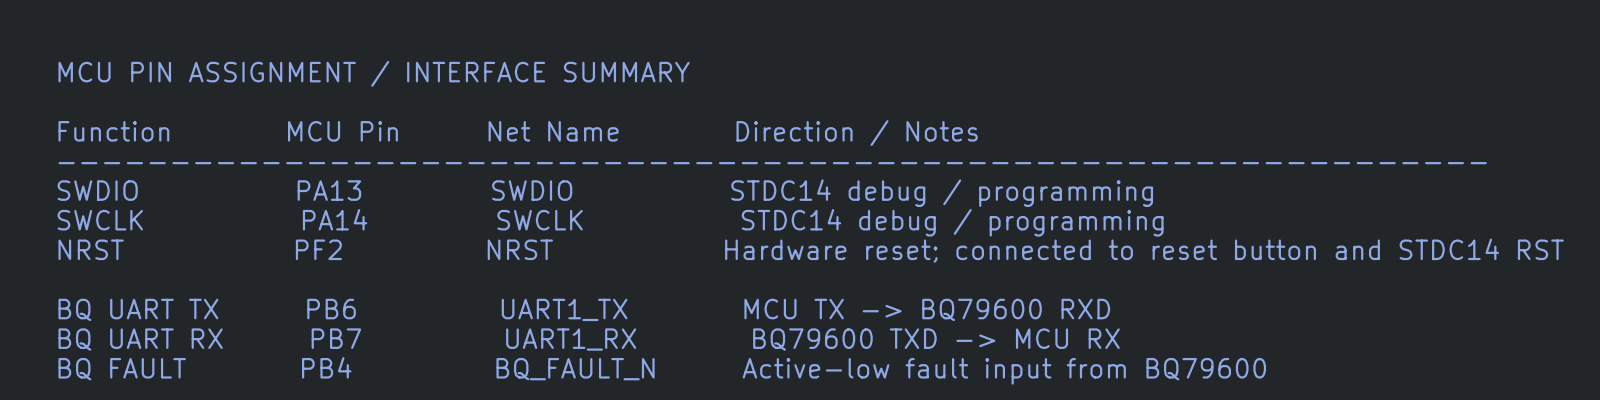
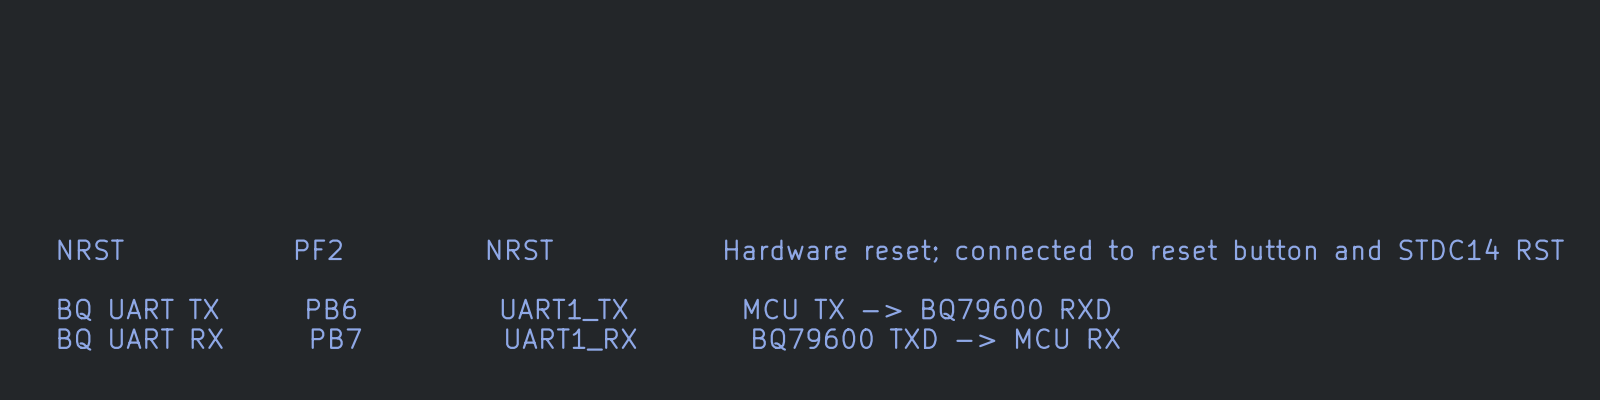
text: MCU PIN ASSIGNMENT / INTERFACE SUMMARY (374, 73) -> none
text: Function MCU Pin Net Name Direction / Notes (518, 133) -> none
text: --------------------------------------------------------------- (772, 163) -> none
text: SWDIO PA13 SWDIO STDC14 debug / programming (605, 193) -> none
text: SWCLK PA14 SWCLK STDC14 debug / programming (610, 222) -> none
text: BQ FAULT PB4 BQ_FAULT_N Active-low fault input from BQ79600 (662, 370) -> none

